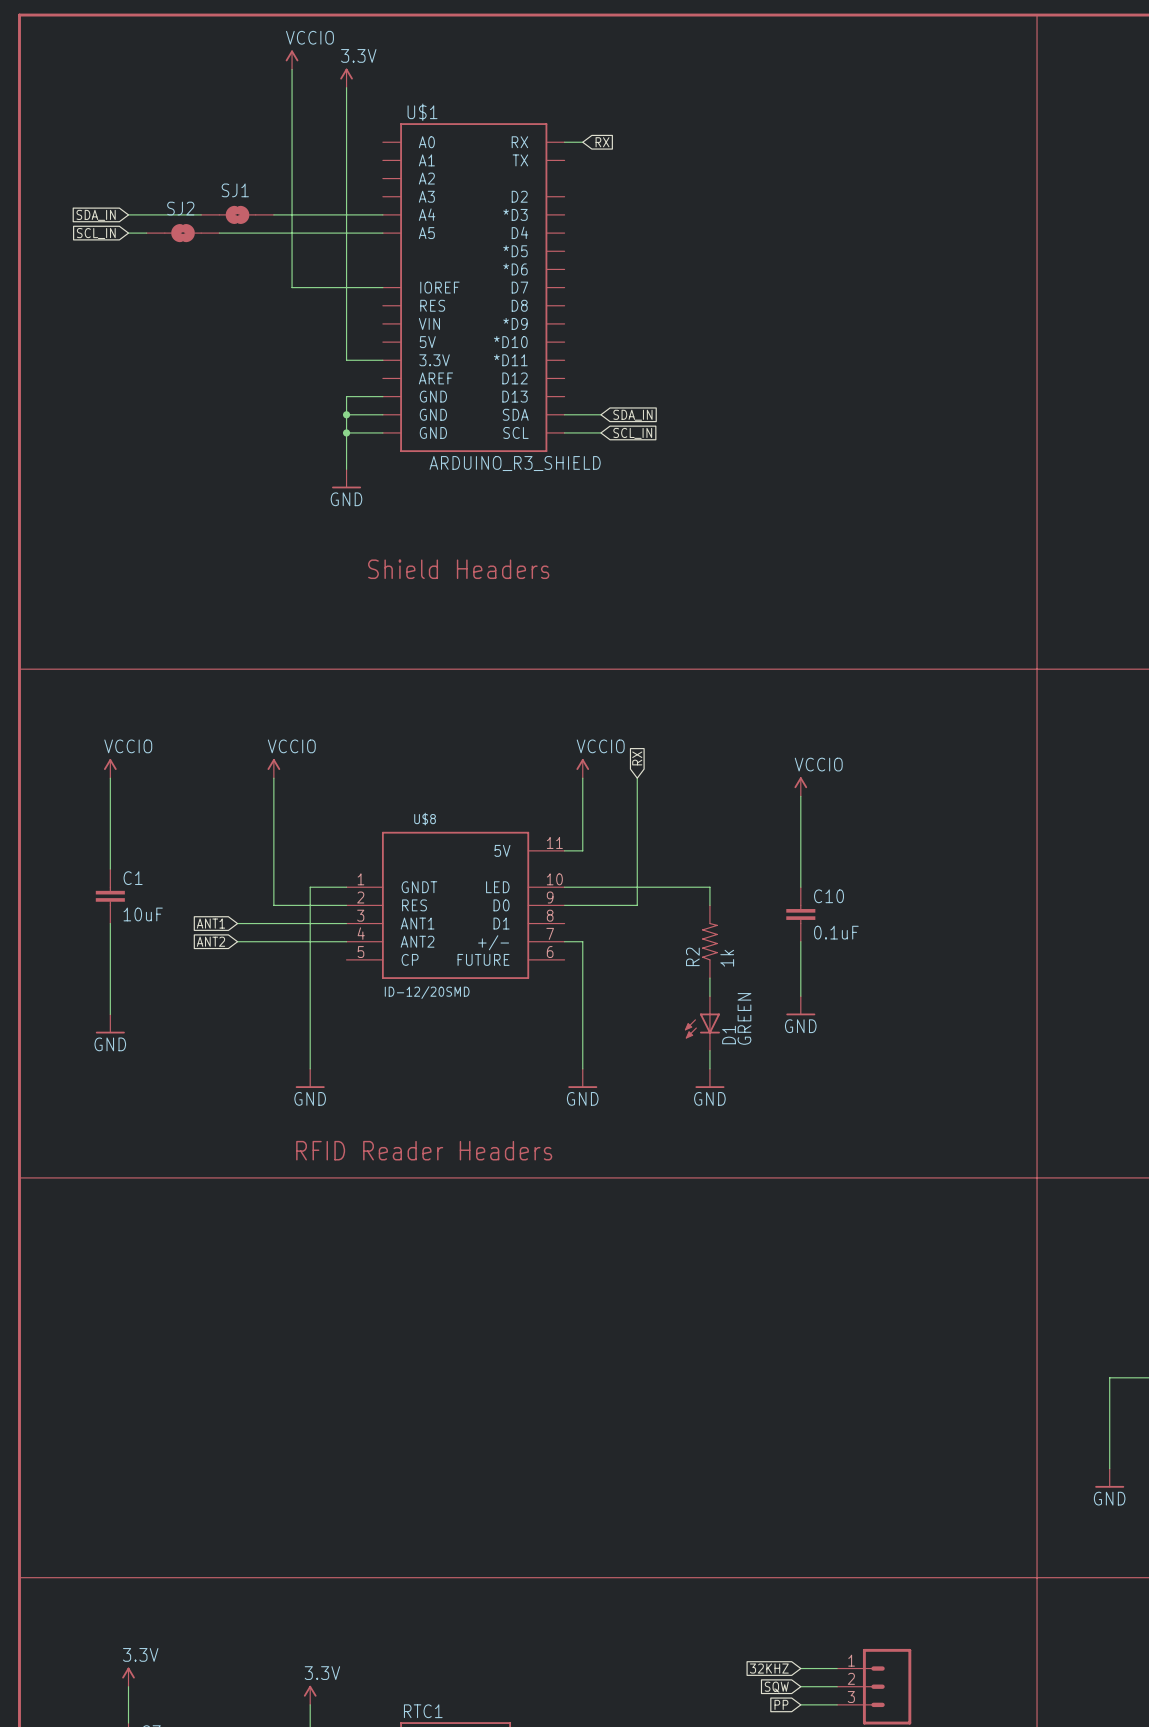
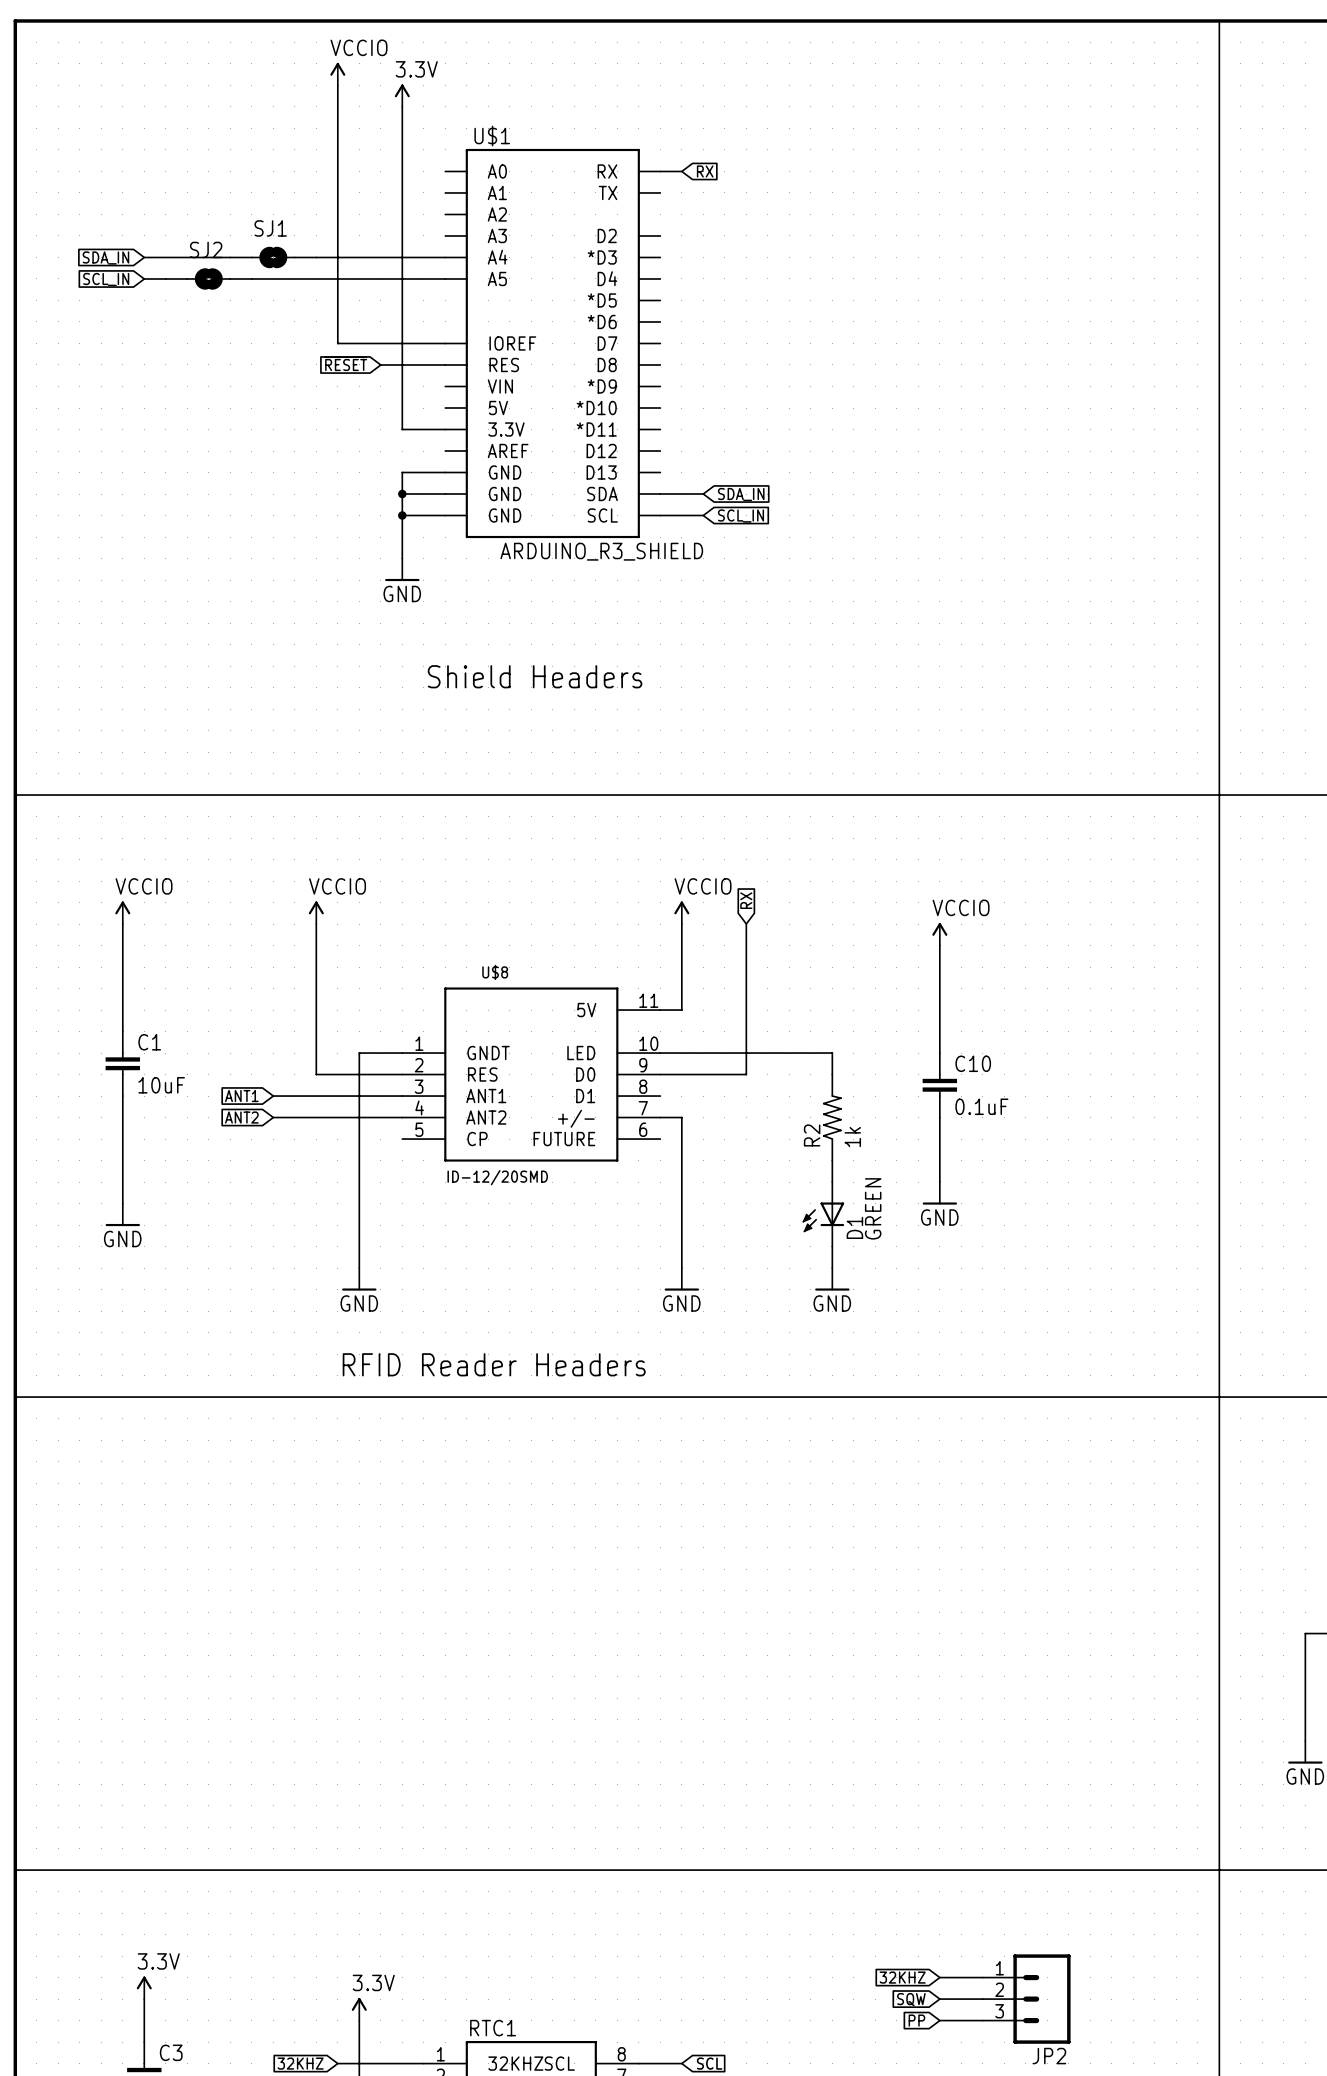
global label: none -> ~{RESET} (345, 363)
wire: none -> (380, 364) (445, 364)

